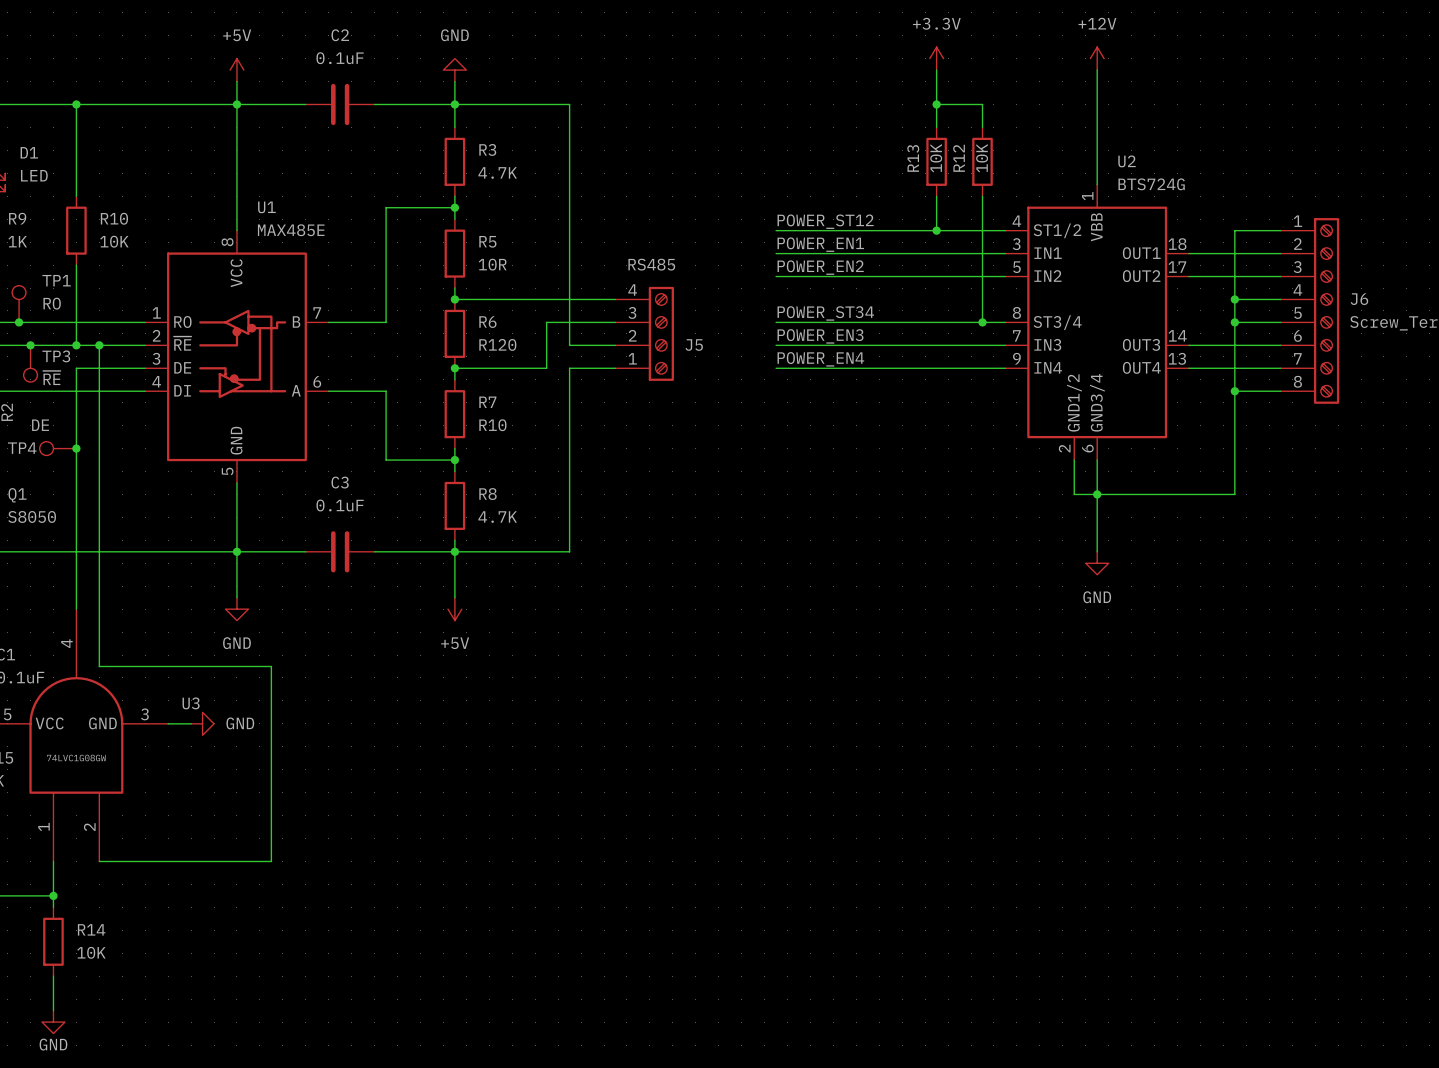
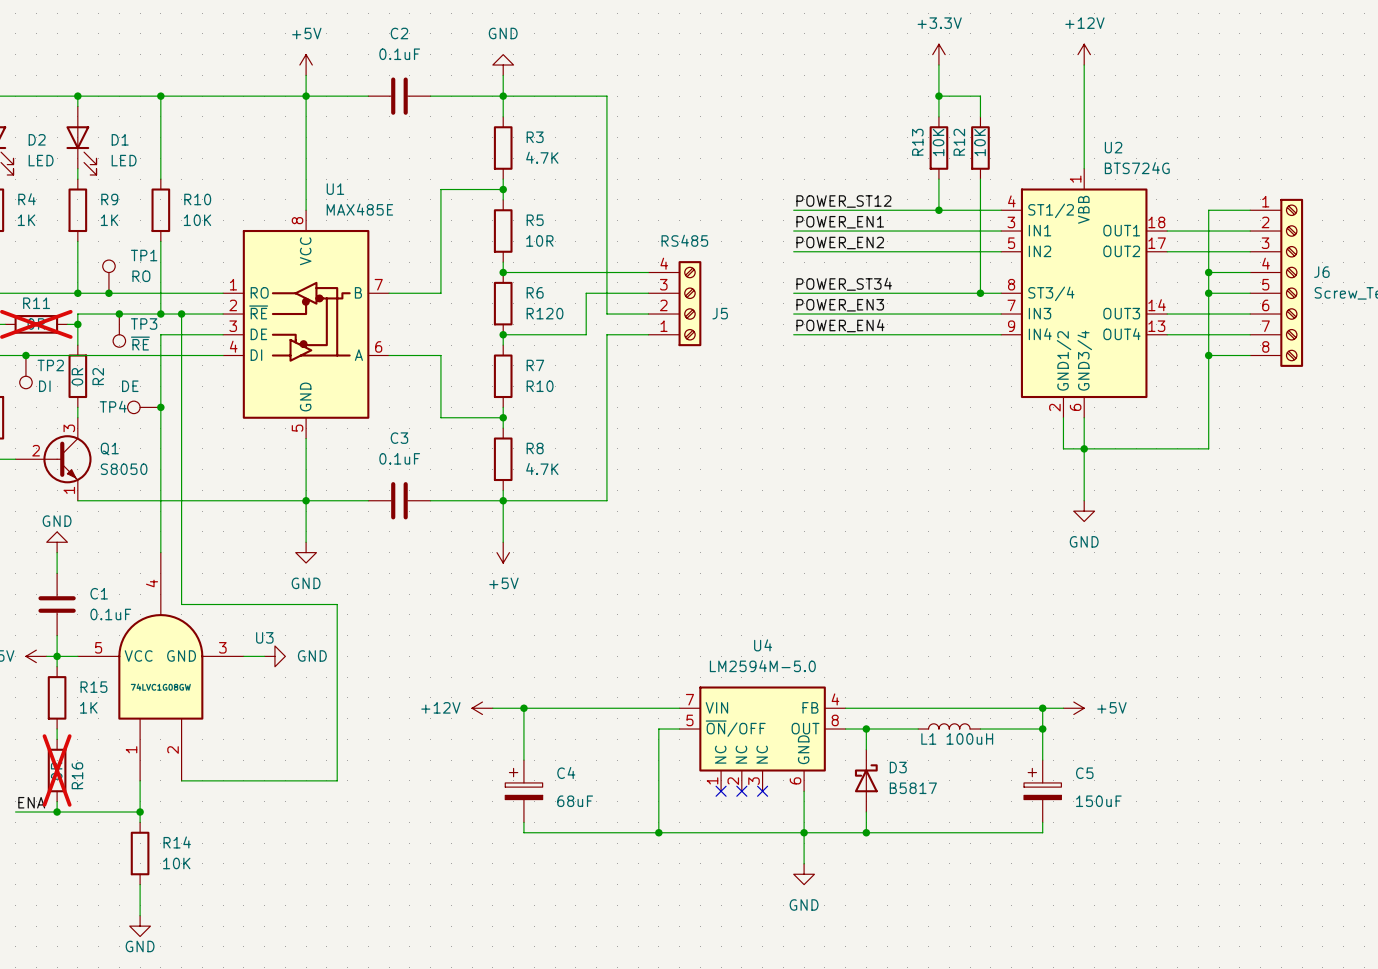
power symbol: none -> +12V (482, 708)
wire: none -> (492, 708) (679, 708)
wire: none -> (523, 708) (523, 760)
junction: none -> (523, 708)
wire: none -> (845, 708) (1063, 708)
wire: none -> (1042, 708) (1042, 760)
junction: none -> (1042, 708)
power symbol: none -> +5V (1073, 708)
L1: none -> 100uH (949, 726)
wire: none -> (679, 729) (658, 729) (658, 832)
wire: none -> (845, 729) (918, 729)
wire: none -> (866, 729) (866, 749)
junction: none -> (866, 729)
wire: none -> (980, 729) (1042, 729)
junction: none -> (1042, 729)
U4: none -> LM2594M-5.0 (762, 738)
D3: none -> B5817 (866, 780)
C4: none -> 68uF (523, 791)
no-connect mark: none -> (721, 791)
no-connect mark: none -> (741, 791)
no-connect mark: none -> (762, 791)
wire: none -> (804, 791) (804, 863)
C5: none -> 150uF (1042, 791)
wire: none -> (866, 812) (866, 832)
wire: none -> (523, 822) (523, 832) (1042, 832) (1042, 822)
junction: none -> (658, 832)
junction: none -> (804, 832)
junction: none -> (866, 832)
power symbol: none -> GND (804, 874)

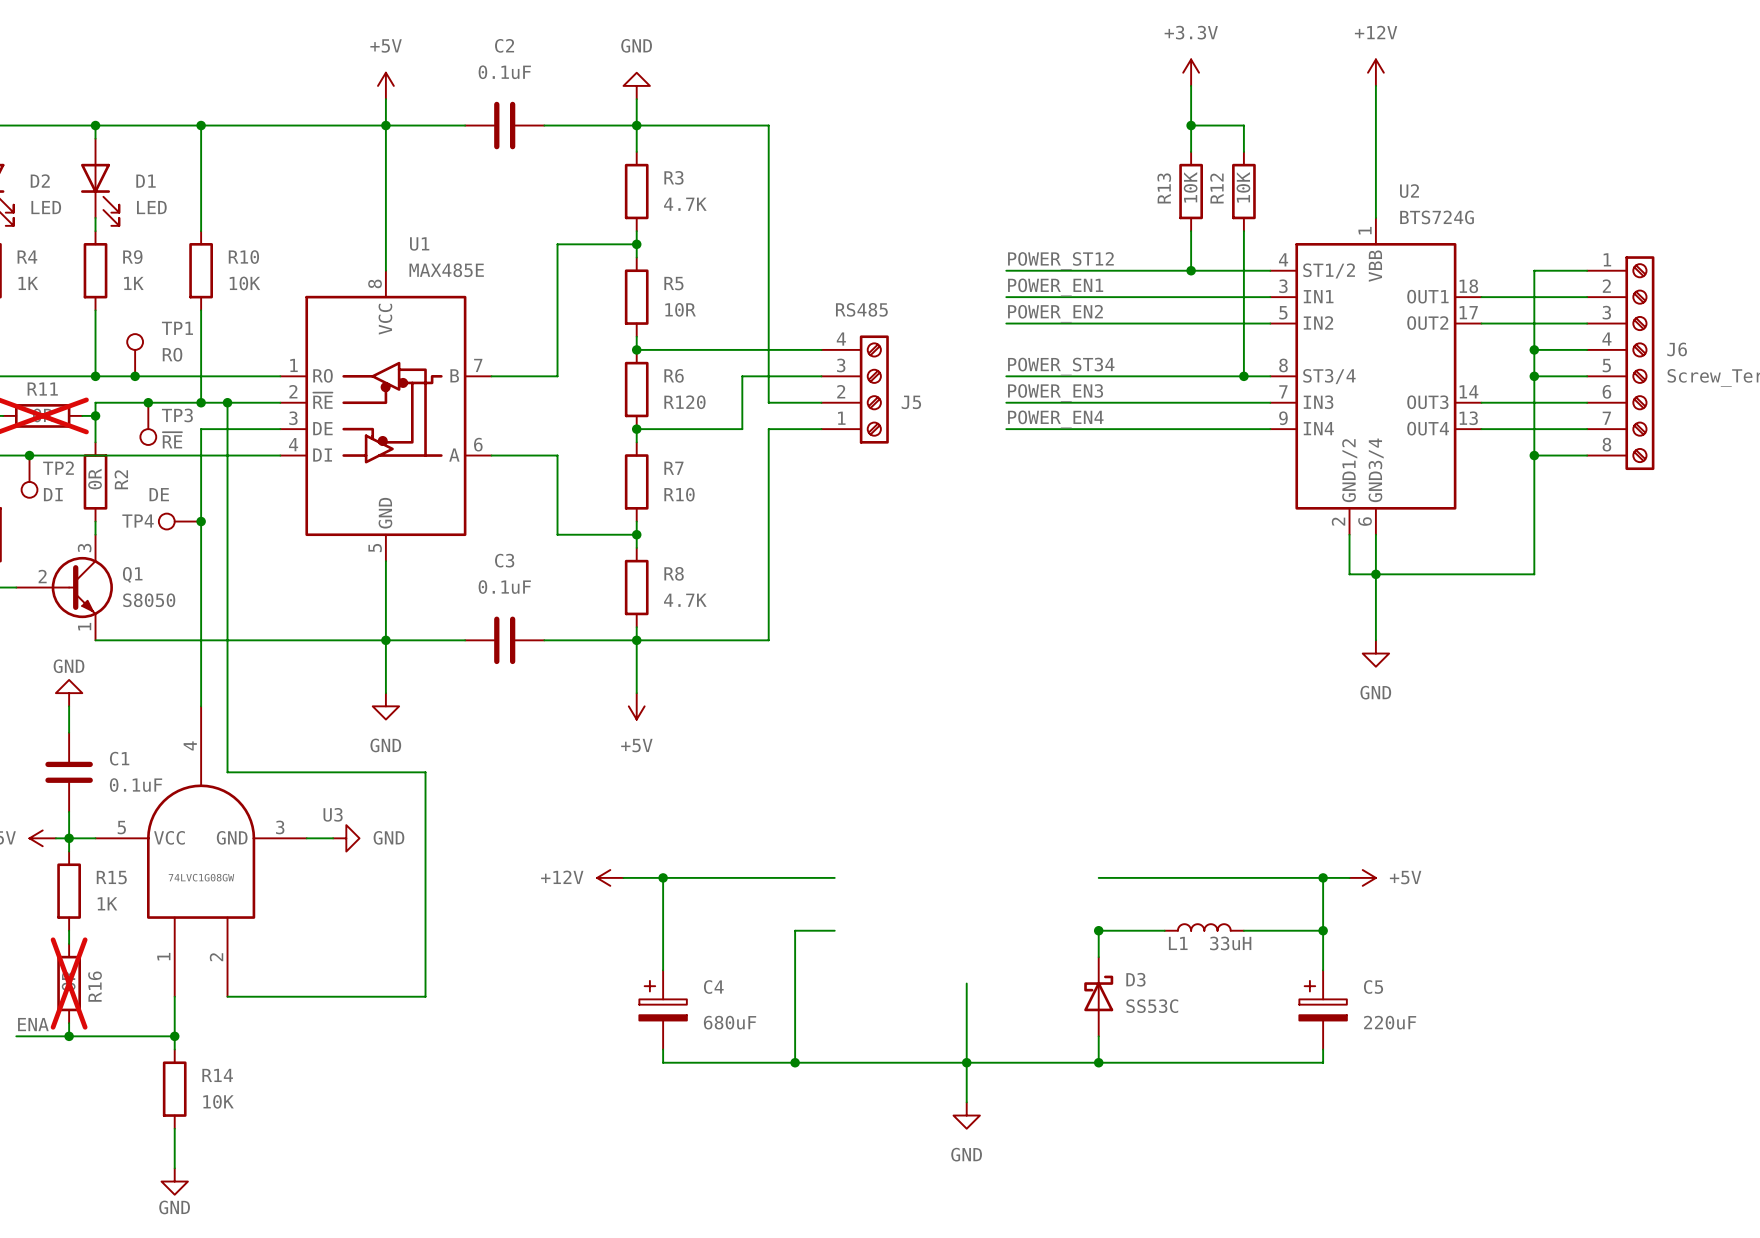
wire: none -> (623, 877) (834, 877)
wire: none -> (663, 877) (663, 904)
wire: none -> (1098, 877) (1349, 877)
wire: none -> (1323, 877) (1323, 904)
power symbol position: +12V (482, 708) -> +12V (610, 877)
wire: (492, 708) (679, 708) -> none
junction position: (523, 708) -> (663, 877)
wire: (845, 708) (1063, 708) -> none
junction position: (1042, 708) -> (1323, 877)
power symbol position: +5V (1073, 708) -> +5V (1362, 877)
wire: none -> (834, 930) (795, 930) (795, 1062)
wire: (679, 729) (658, 729) (658, 832) -> none
wire: (845, 729) (866, 729) -> none
U4: LM2594M-5.0 (762, 738) -> none
L1 value: 100uH (969, 738) -> 33uH (1230, 943)
wire: none -> (966, 983) (966, 1102)
D3 value: B5817 (913, 788) -> SS53C (1152, 1006)
no-connect mark: (721, 791) -> none
no-connect mark: (741, 791) -> none
no-connect mark: (762, 791) -> none
wire: (804, 791) (804, 863) -> none
C4 value: 68uF (575, 801) -> 680uF (730, 1022)
C5 value: 150uF (1098, 801) -> 220uF (1390, 1022)
junction position: (658, 832) -> (795, 1062)
junction position: (804, 832) -> (966, 1062)
power symbol position: GND (804, 874) -> GND (966, 1115)

